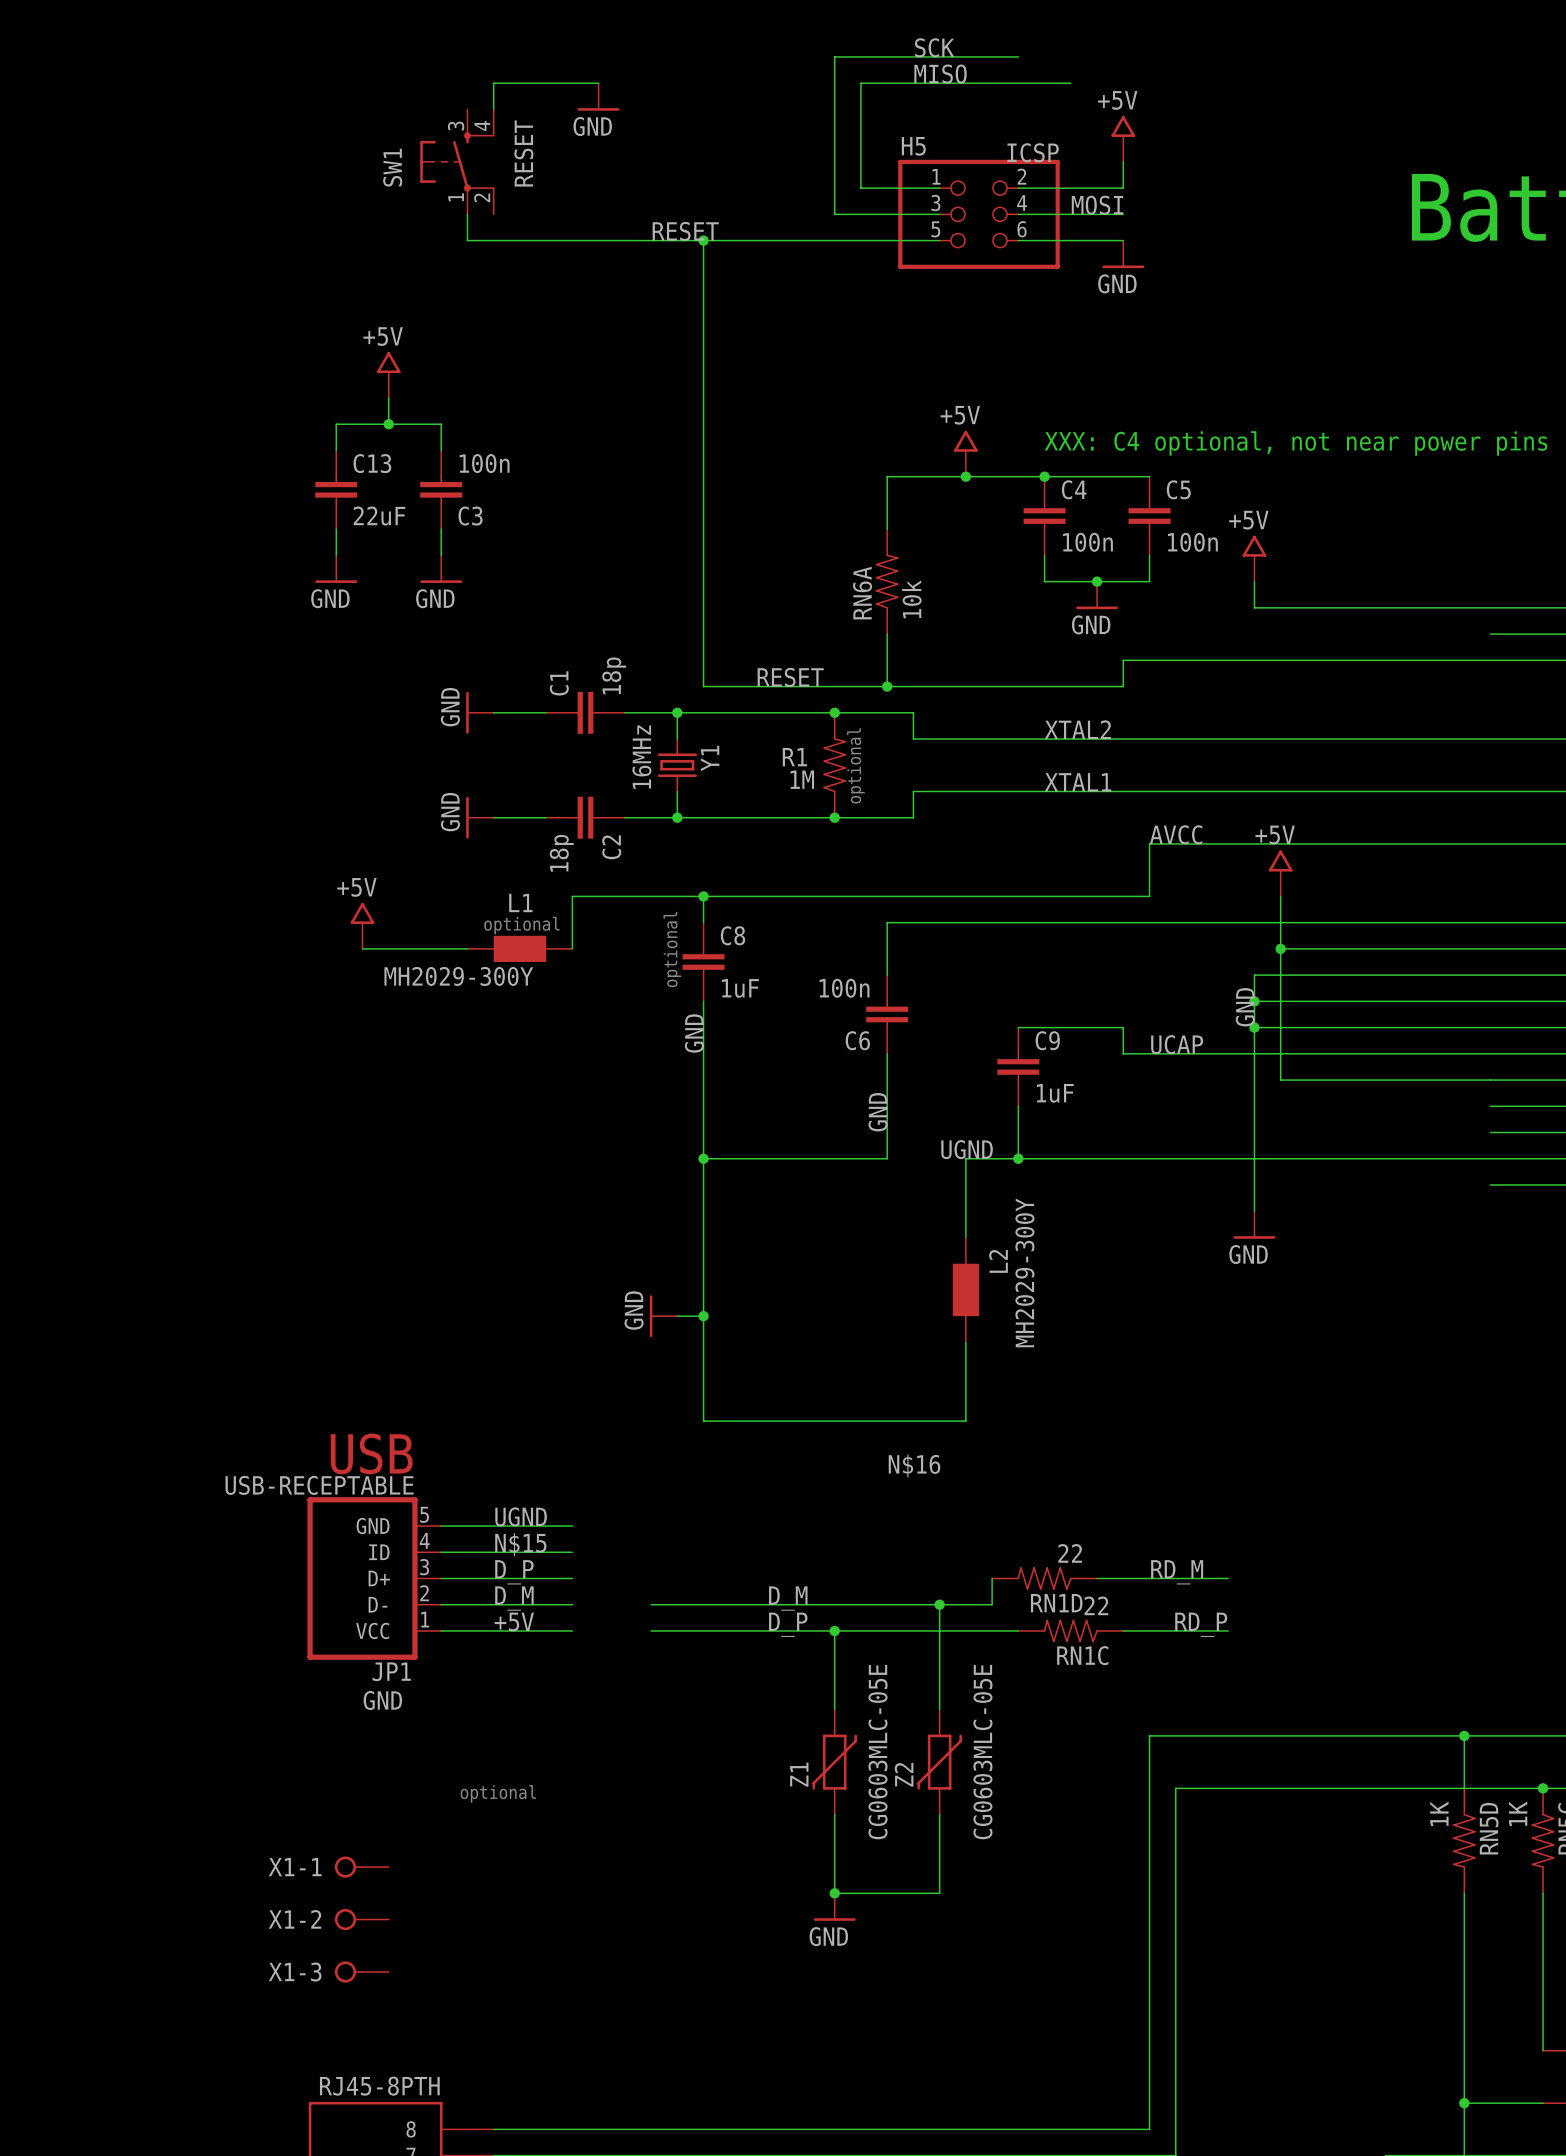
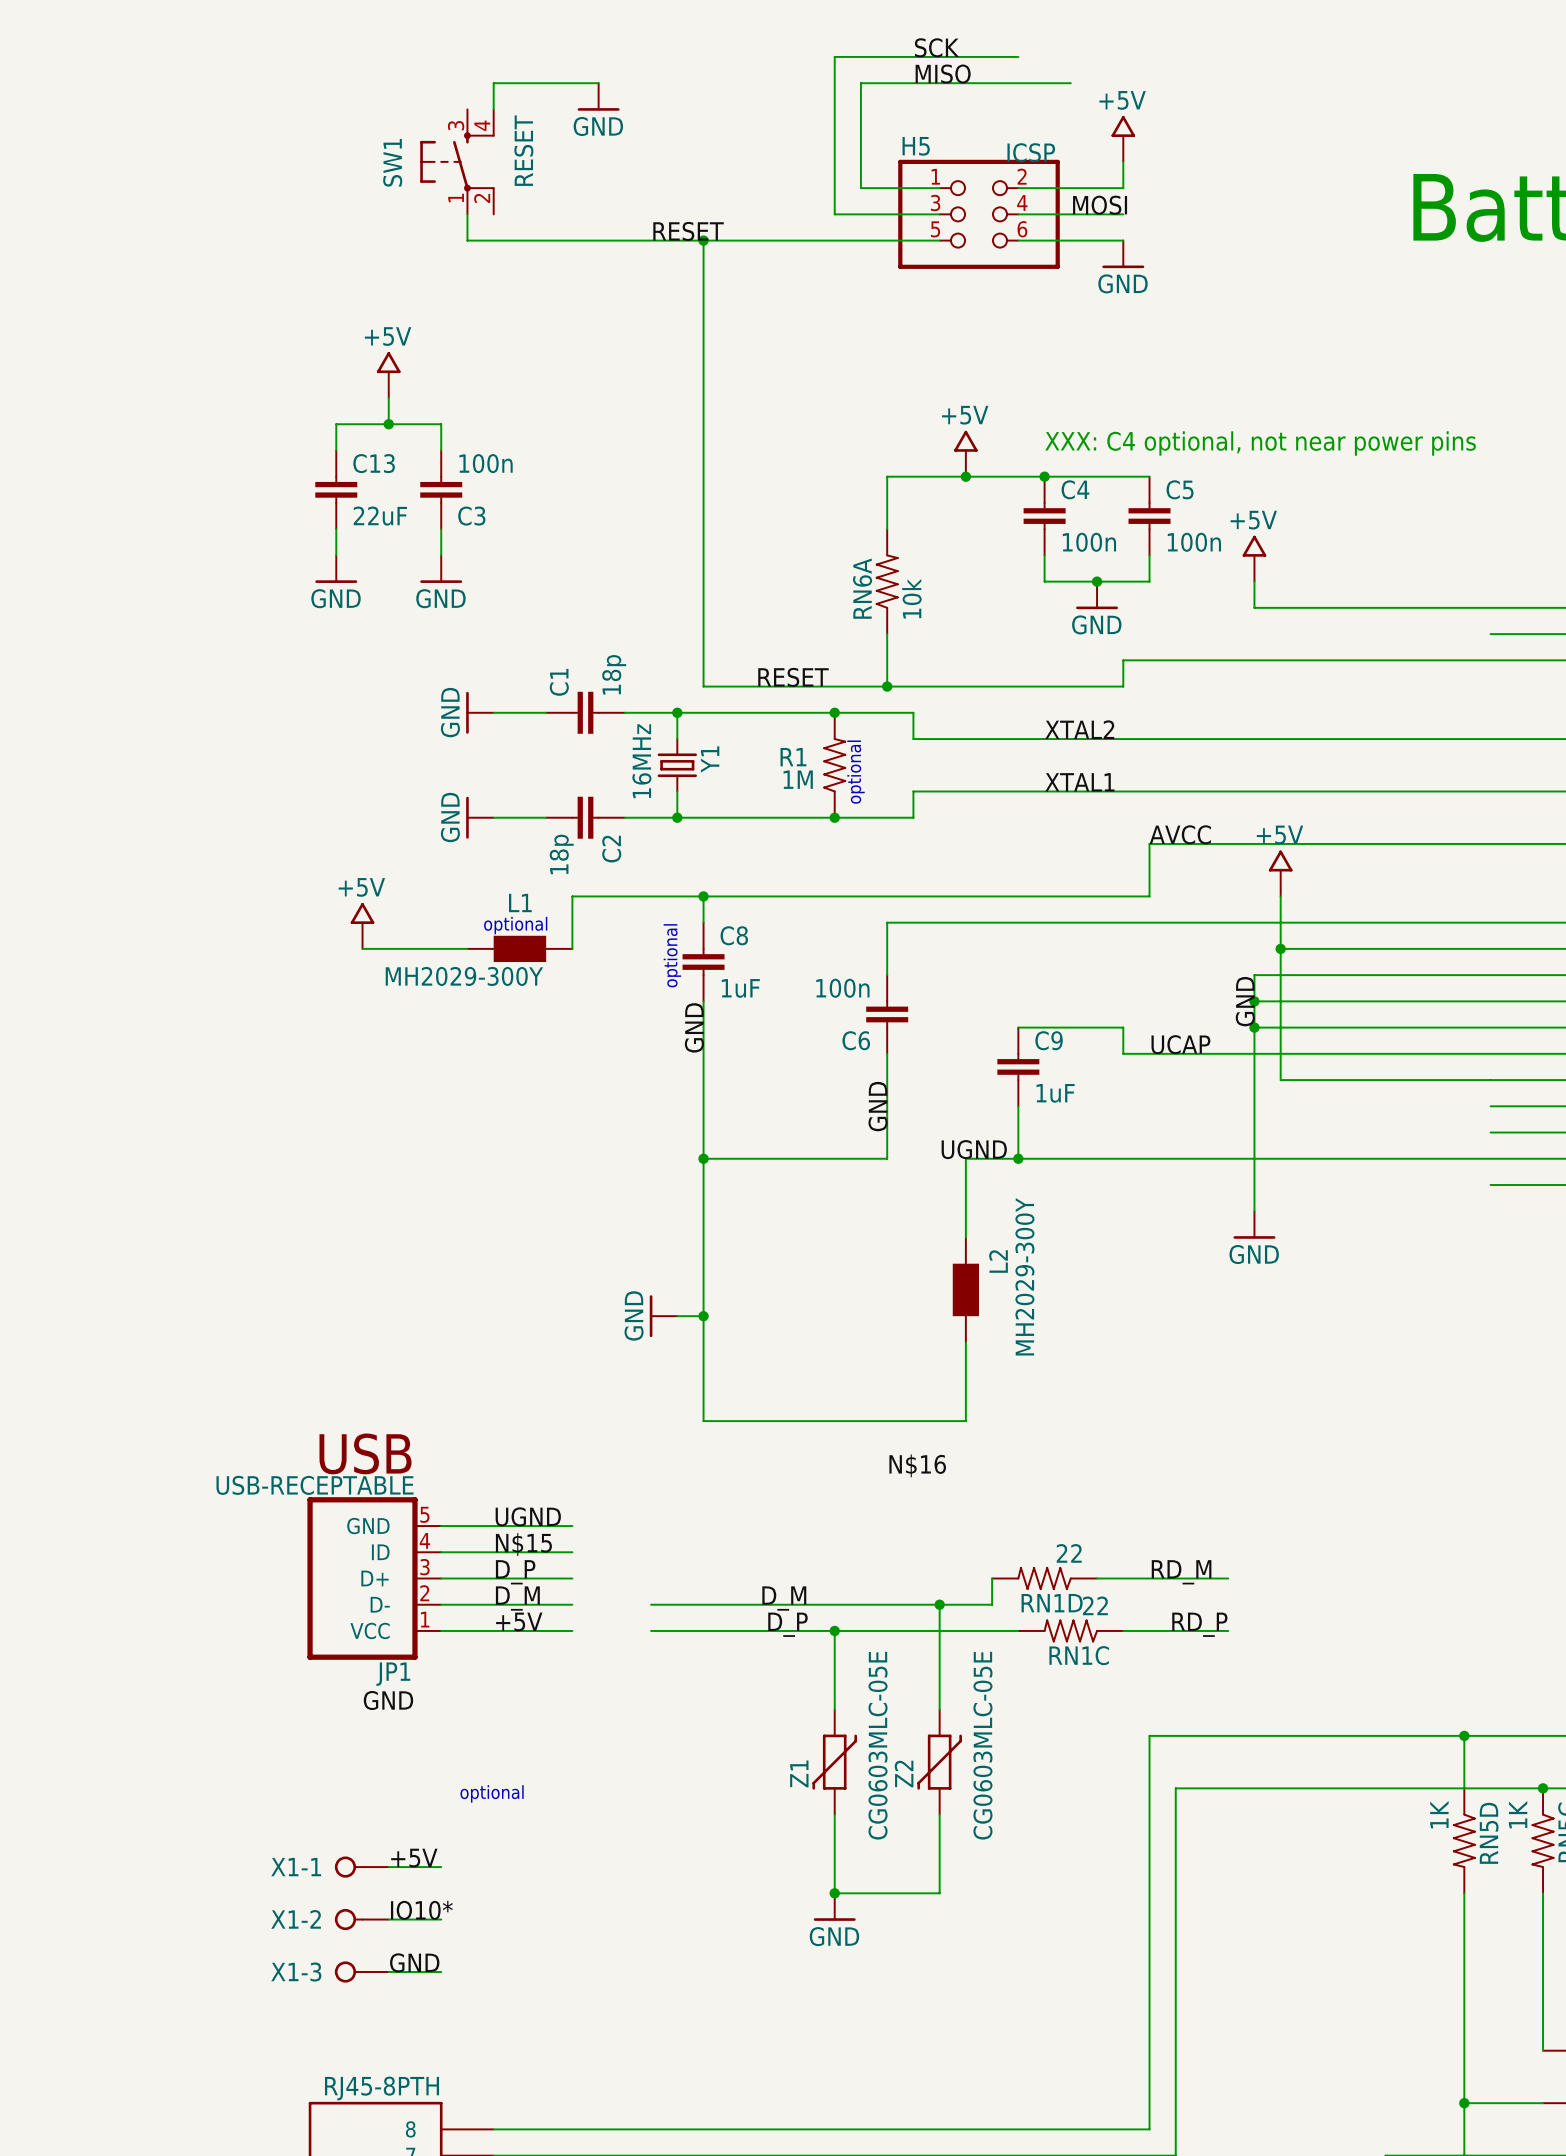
label: none -> +5V (414, 1858)
wire: none -> (388, 1867) (441, 1867)
label: none -> IO10* (421, 1910)
wire: none -> (388, 1919) (441, 1919)
label: none -> GND (414, 1962)
wire: none -> (388, 1972) (441, 1972)

